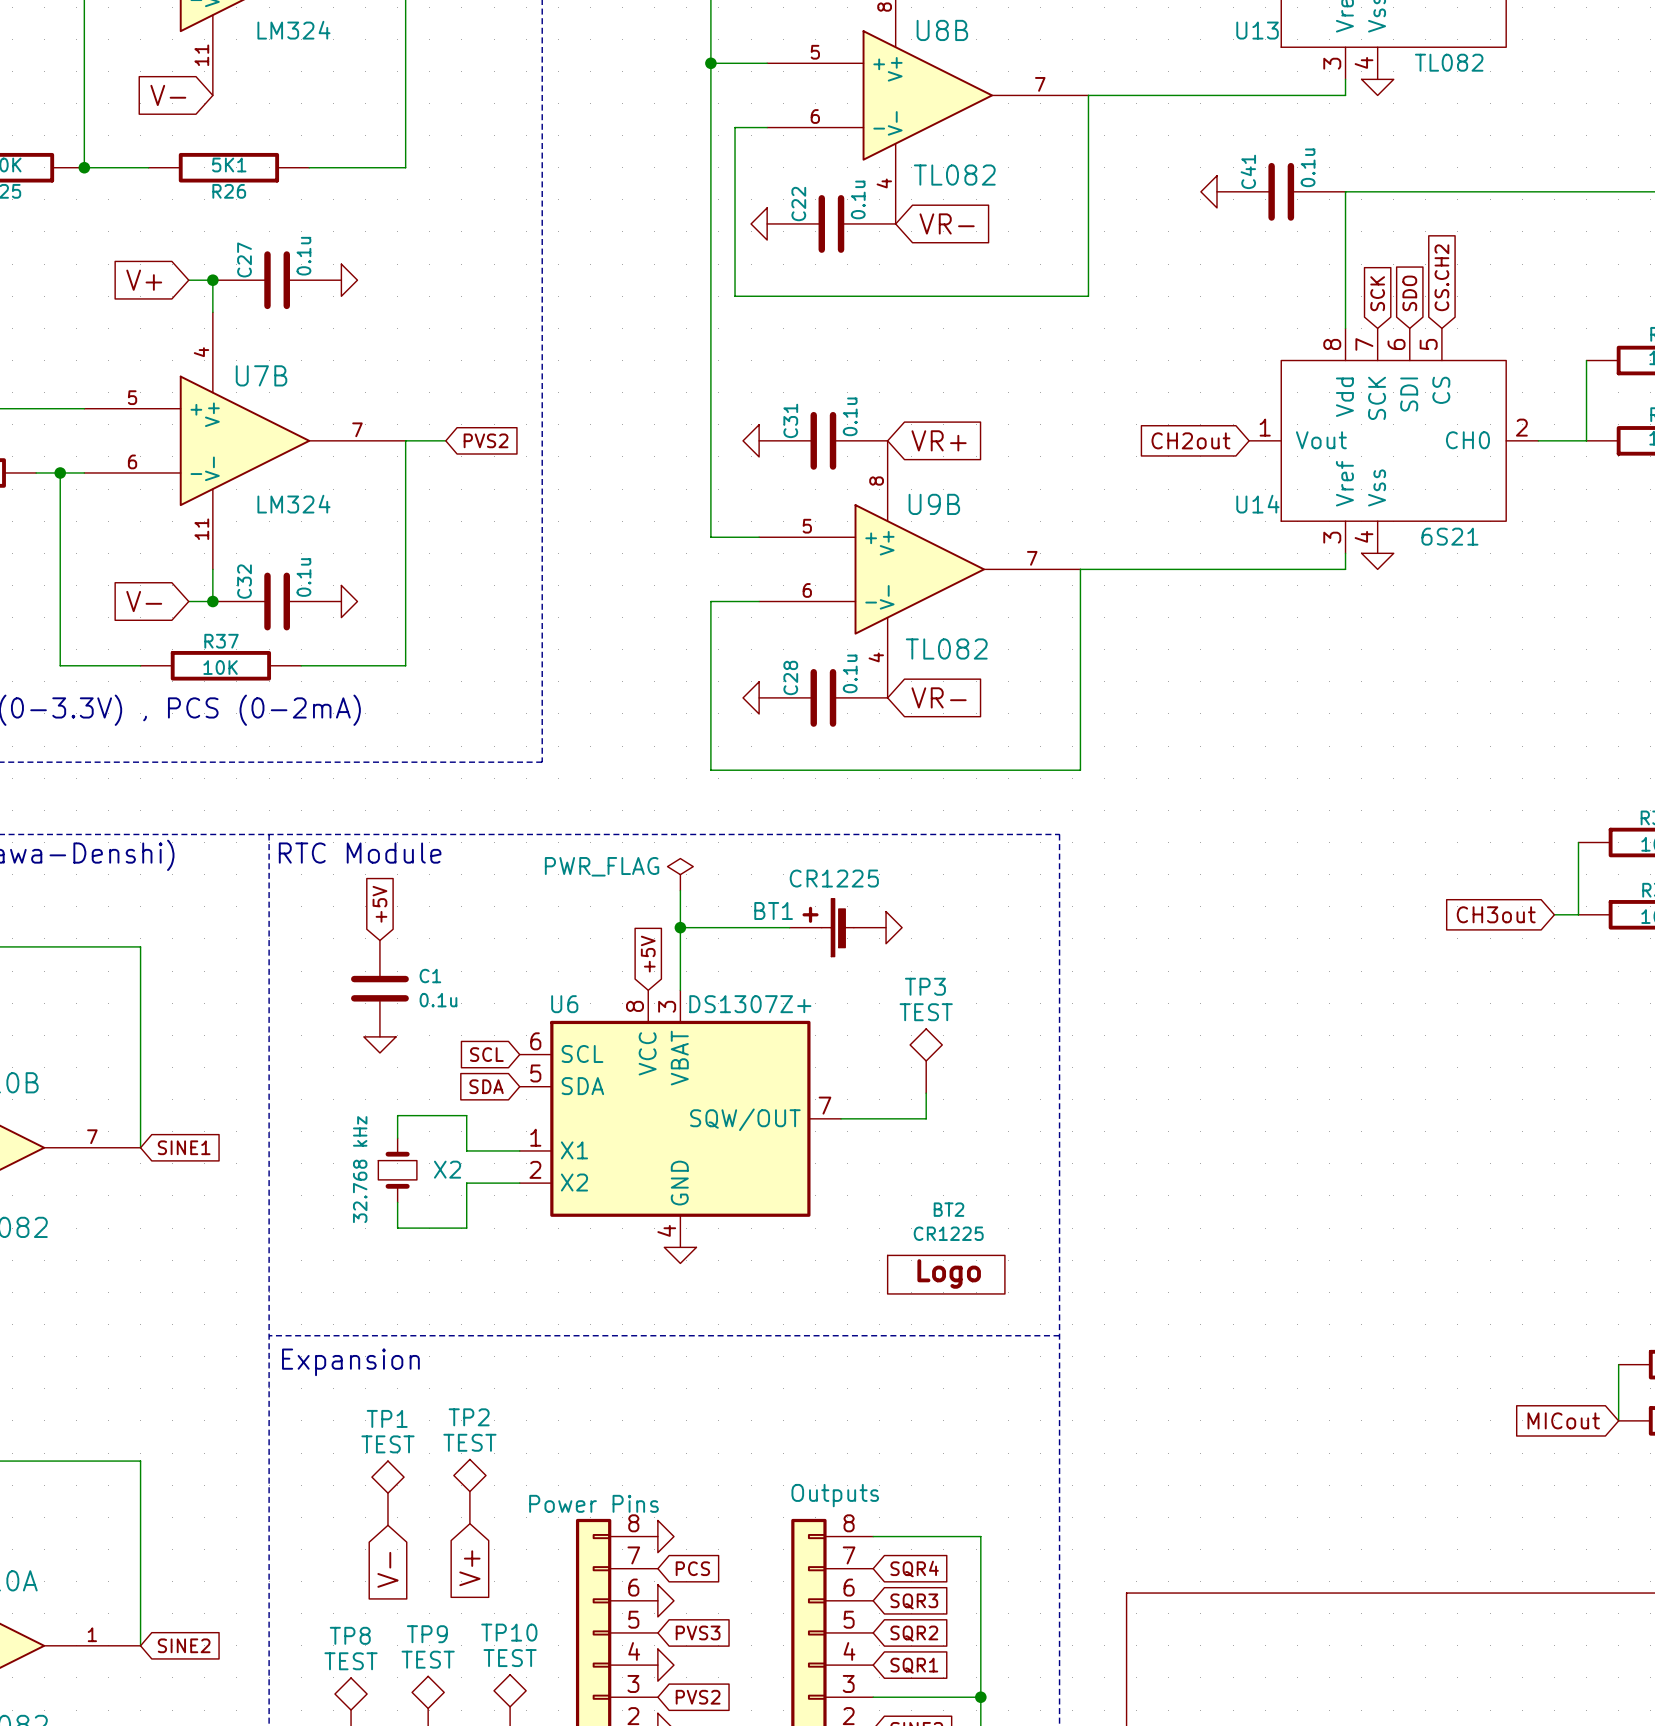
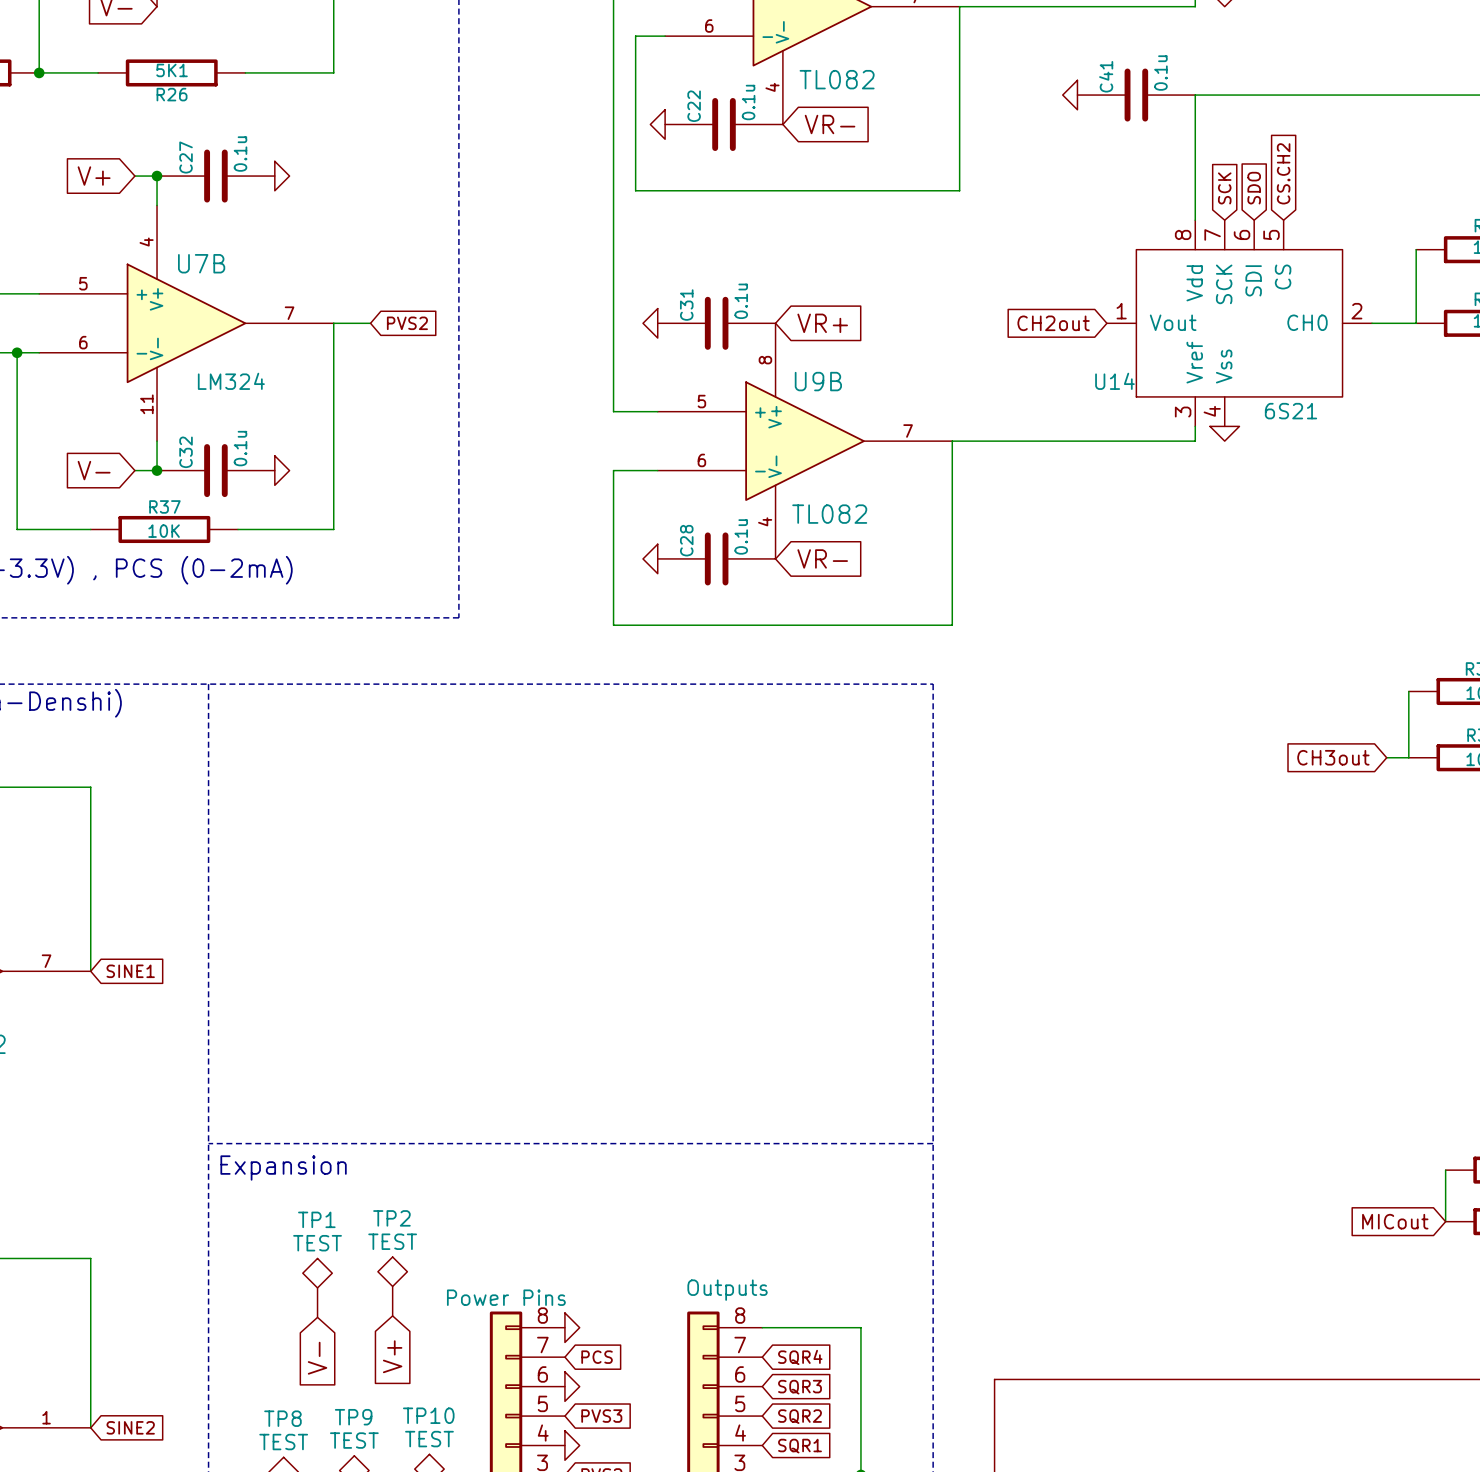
text: RTC Module (360, 853) -> none
power symbol: PWR_FLAG (680, 874) -> none
wire: (680, 890) (680, 990) -> none
global label: +5V (379, 904) -> none
wire: (680, 927) (789, 927) -> none
junction: (680, 927) -> none
BT1: CR1225 (837, 927) -> none
power symbol: (894, 927) -> none
global label: +5V (648, 954) -> none
C1: 0.1u (379, 988) -> none
power symbol: (379, 1044) -> none
global label: SCL (486, 1054) -> none
TP3: TEST (926, 1061) -> none
global label: SDA (486, 1086) -> none
wire: (926, 1093) (926, 1118) (841, 1118) -> none
U6: DS1307Z+ (680, 1118) -> none
wire: (397, 1138) (397, 1115) (466, 1115) (466, 1150) (519, 1150) -> none
X2: 32.768 kHz (397, 1170) -> none
wire: (519, 1183) (466, 1183) (466, 1228) (397, 1228) (397, 1202) -> none
power symbol: (680, 1255) -> none
BT2: CR1225 (946, 1274) -> none

